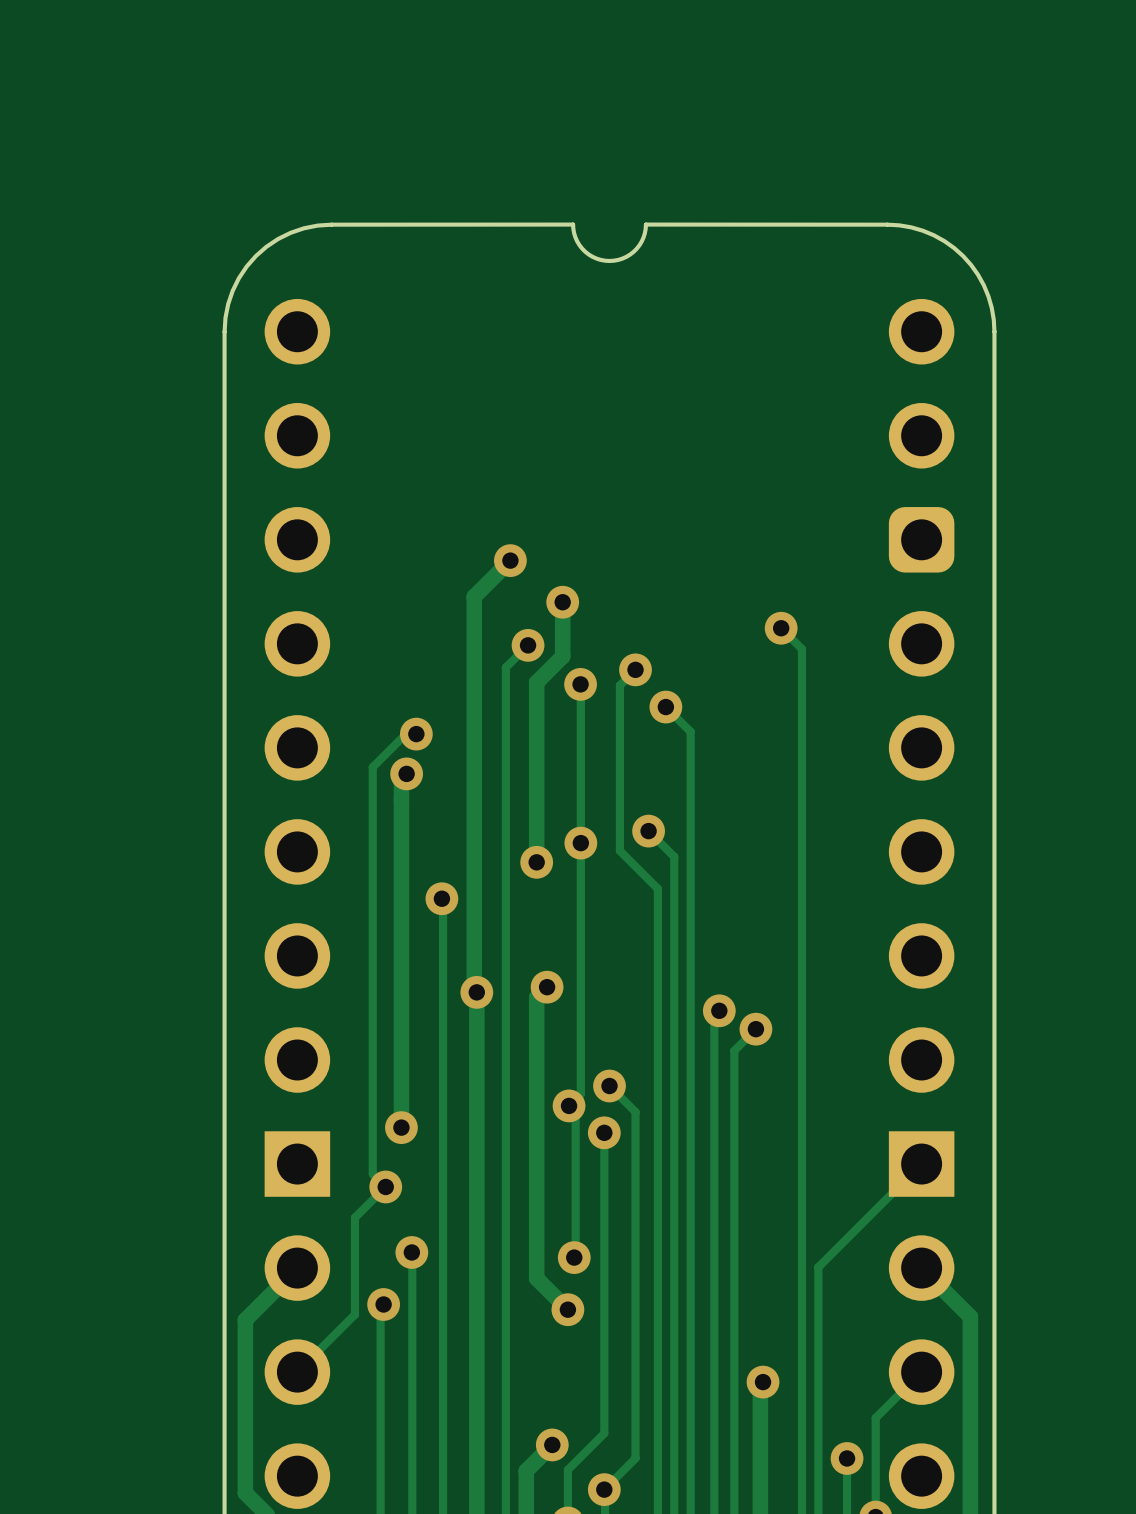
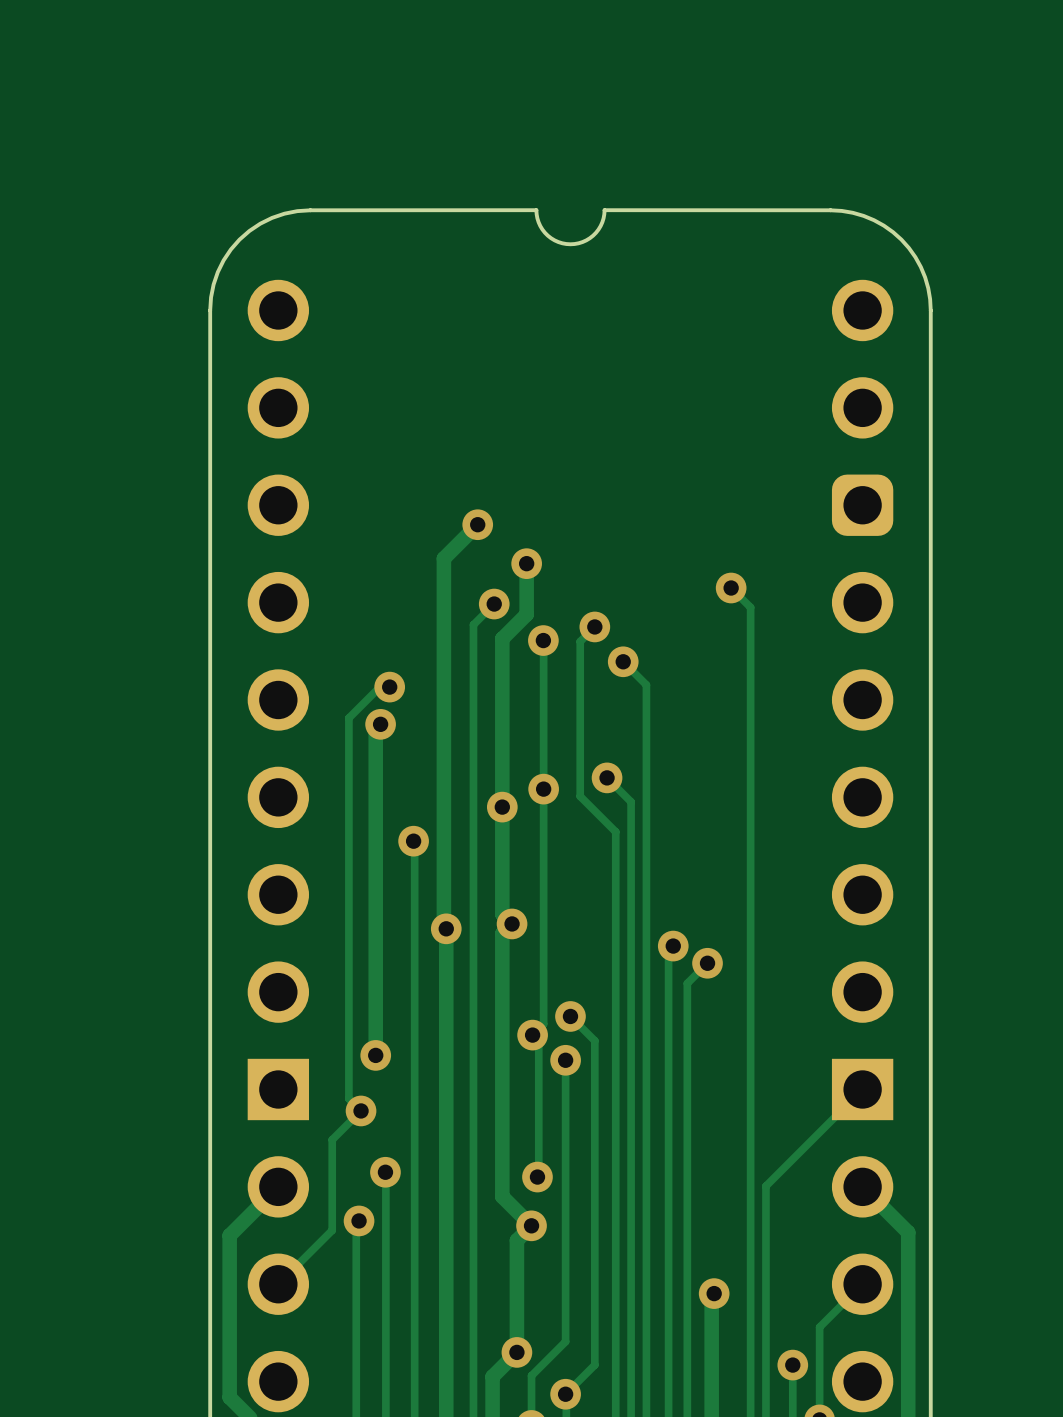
track: none -> (502, 807) (502, 914) (512, 923)
track: none -> (531, 1225) (516, 1240) (516, 1352)

